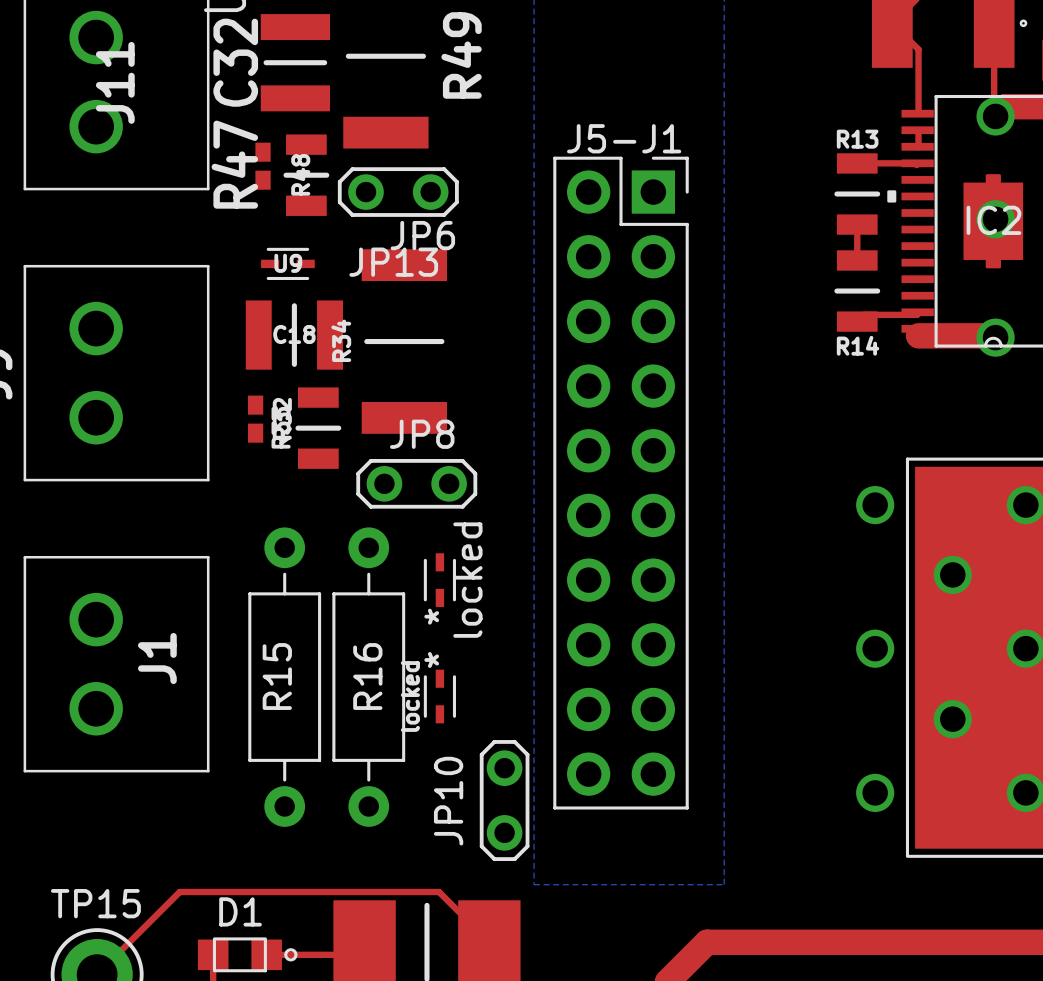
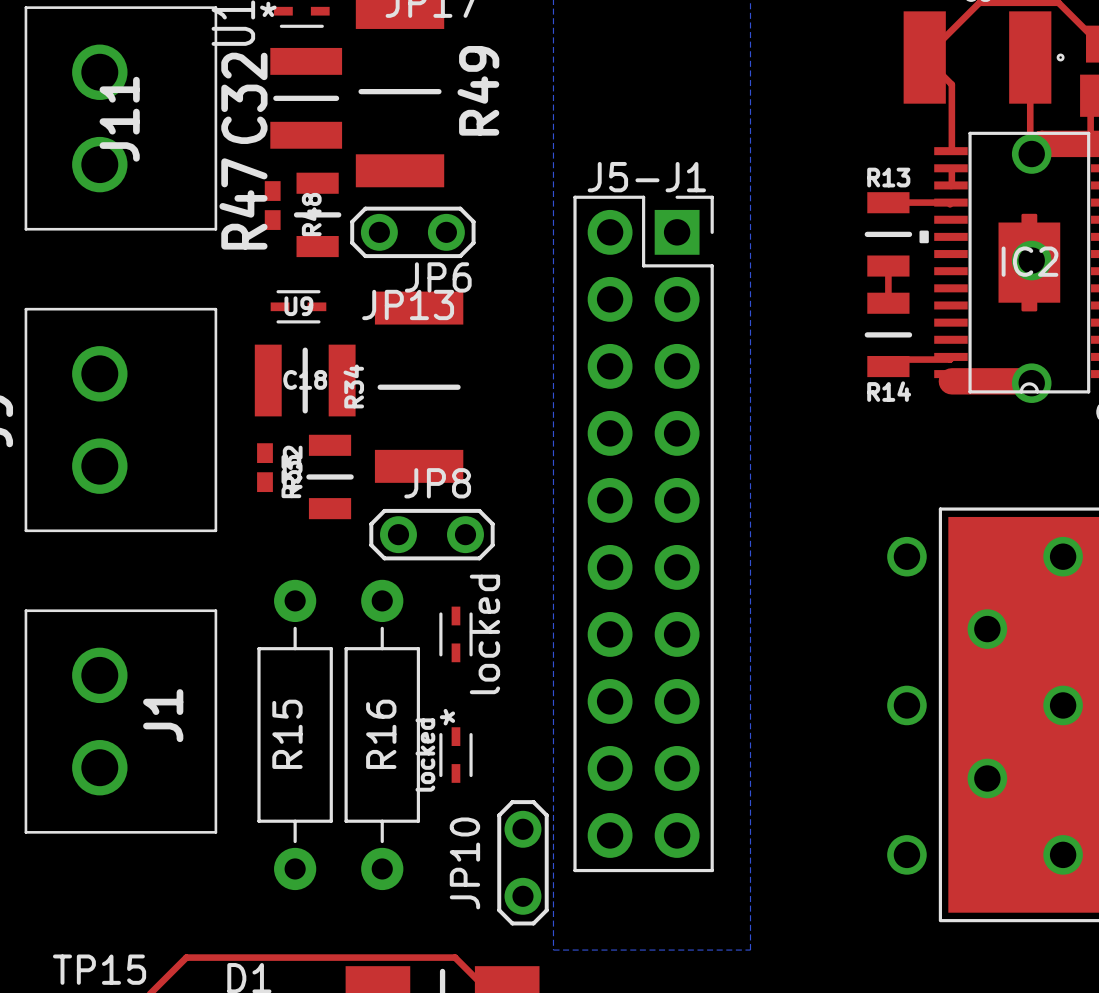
locked text: * (431, 616) -> none

